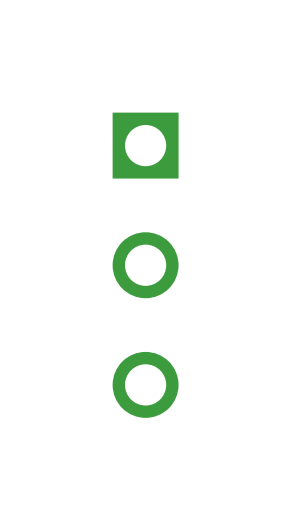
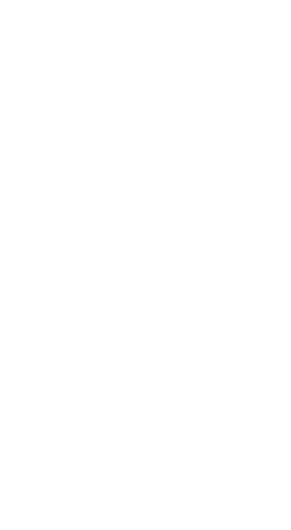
part: (145, 265) -> none

